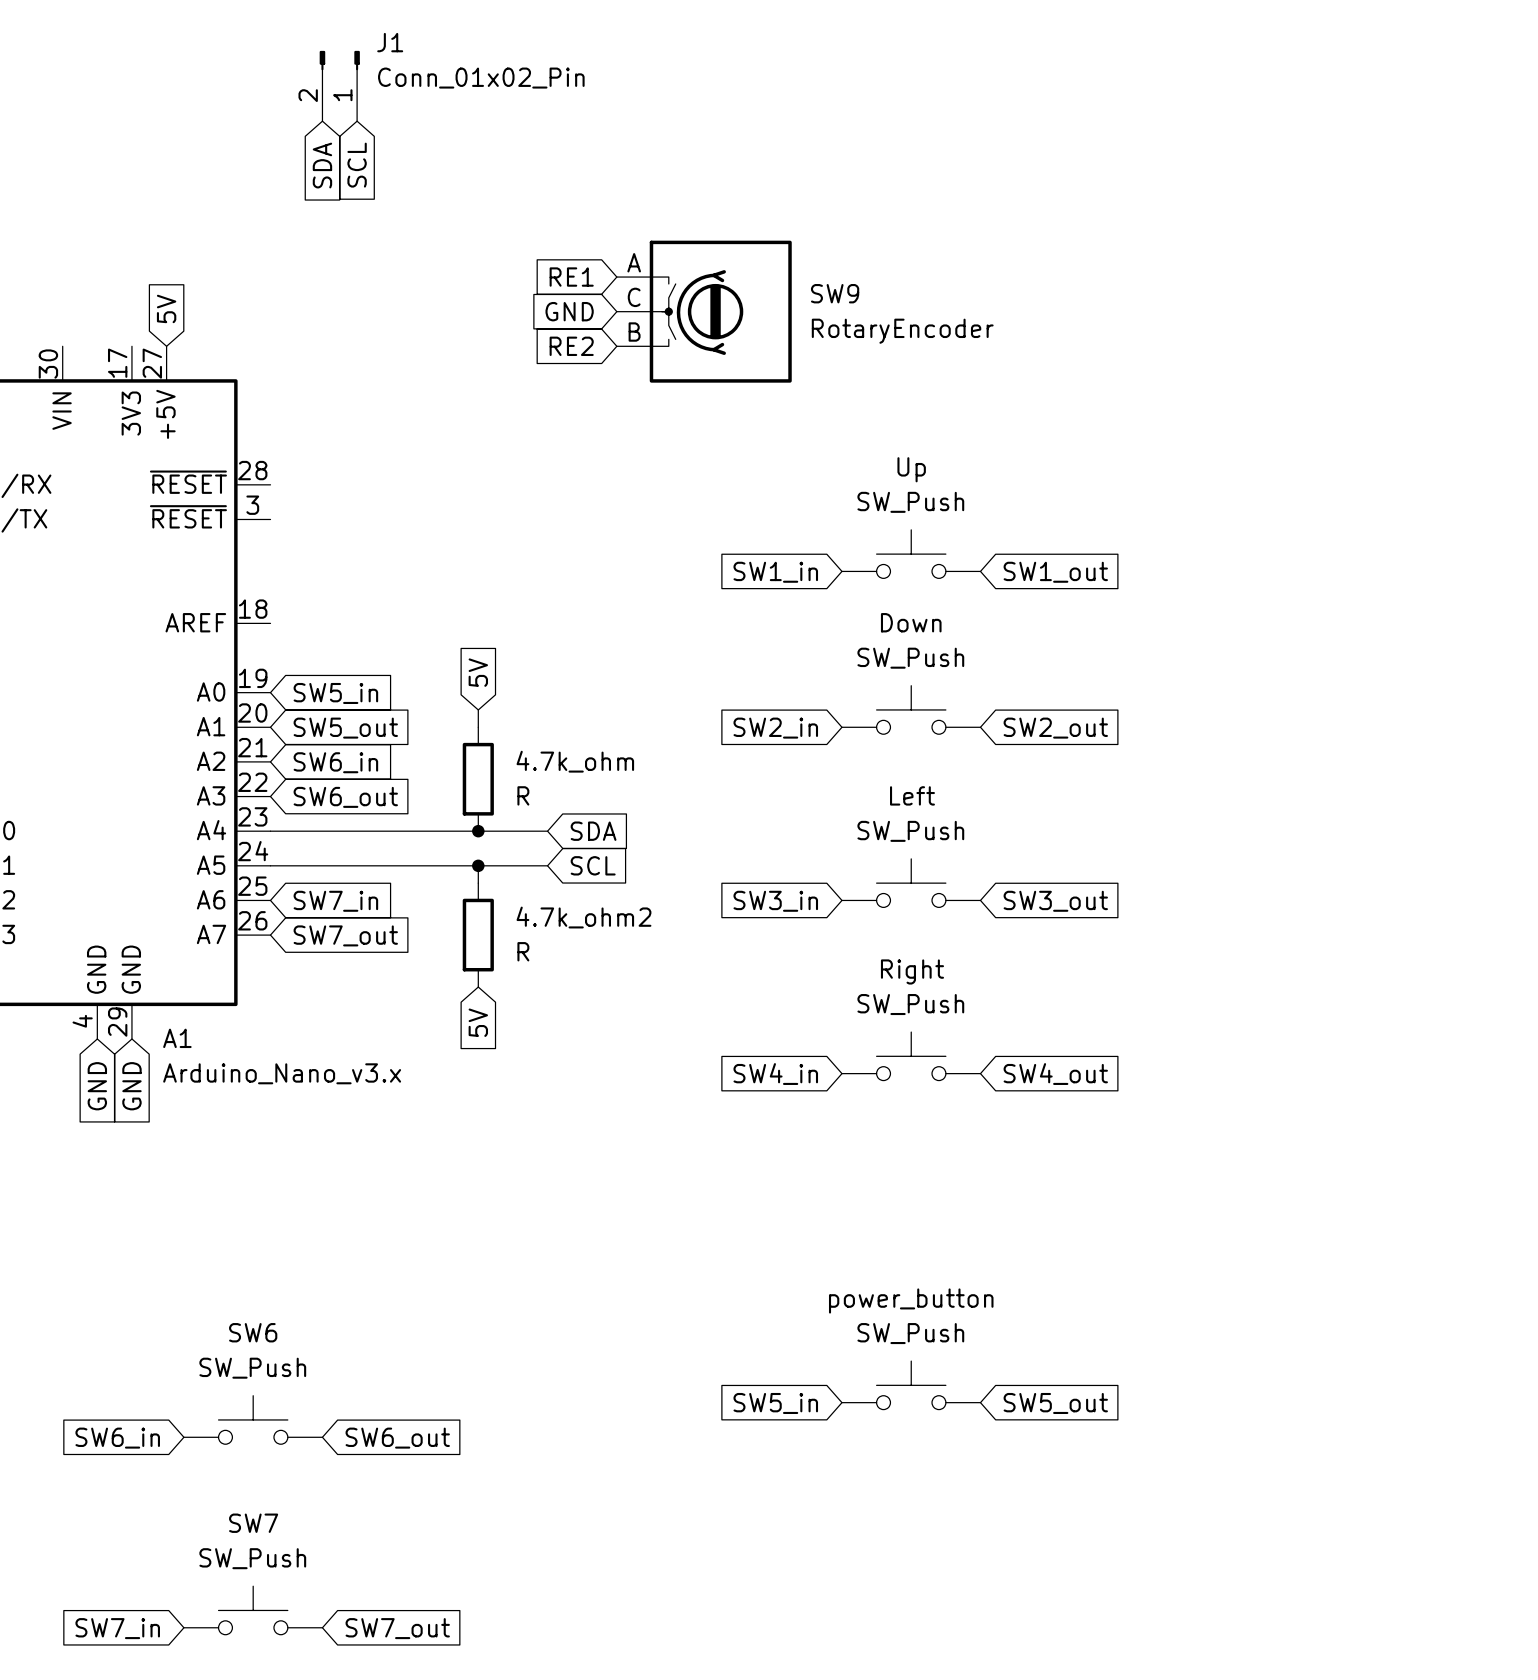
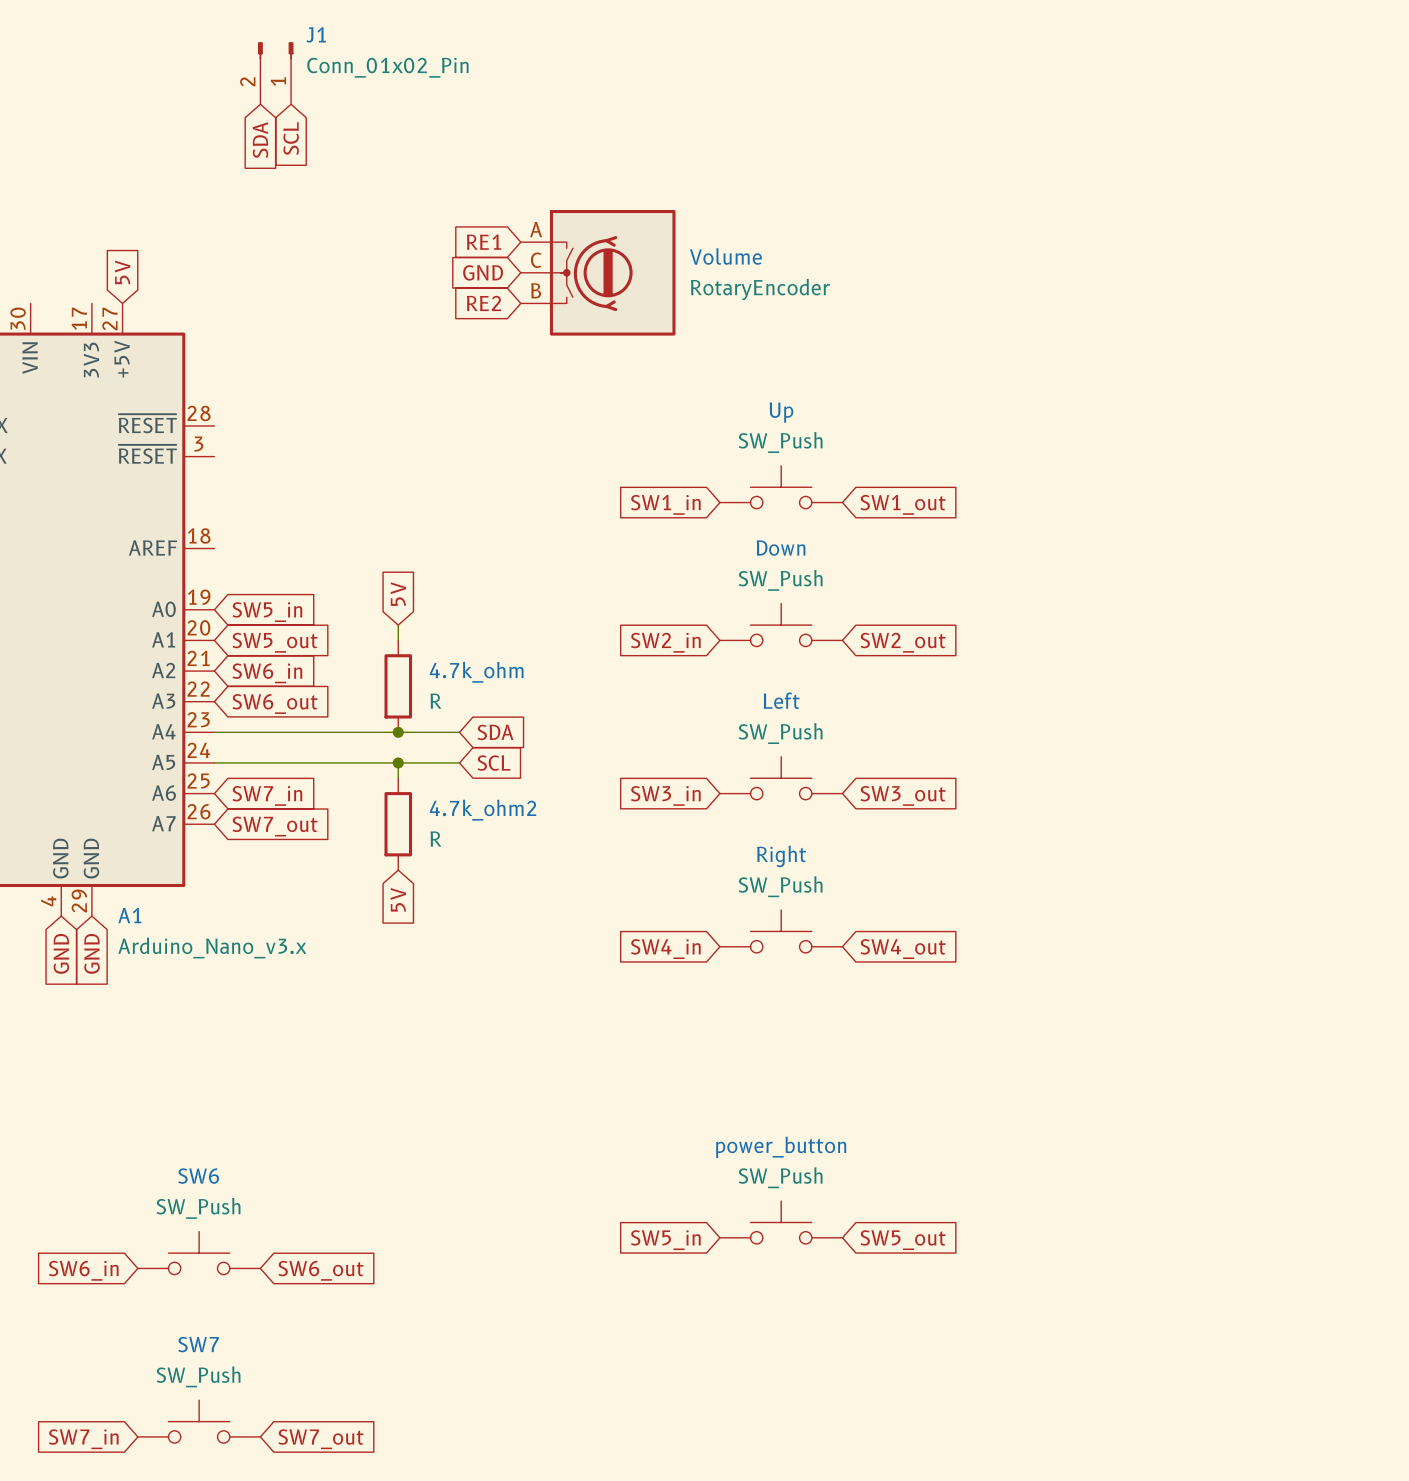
SW9 name: SW9 (835, 293) -> Volume (725, 256)

